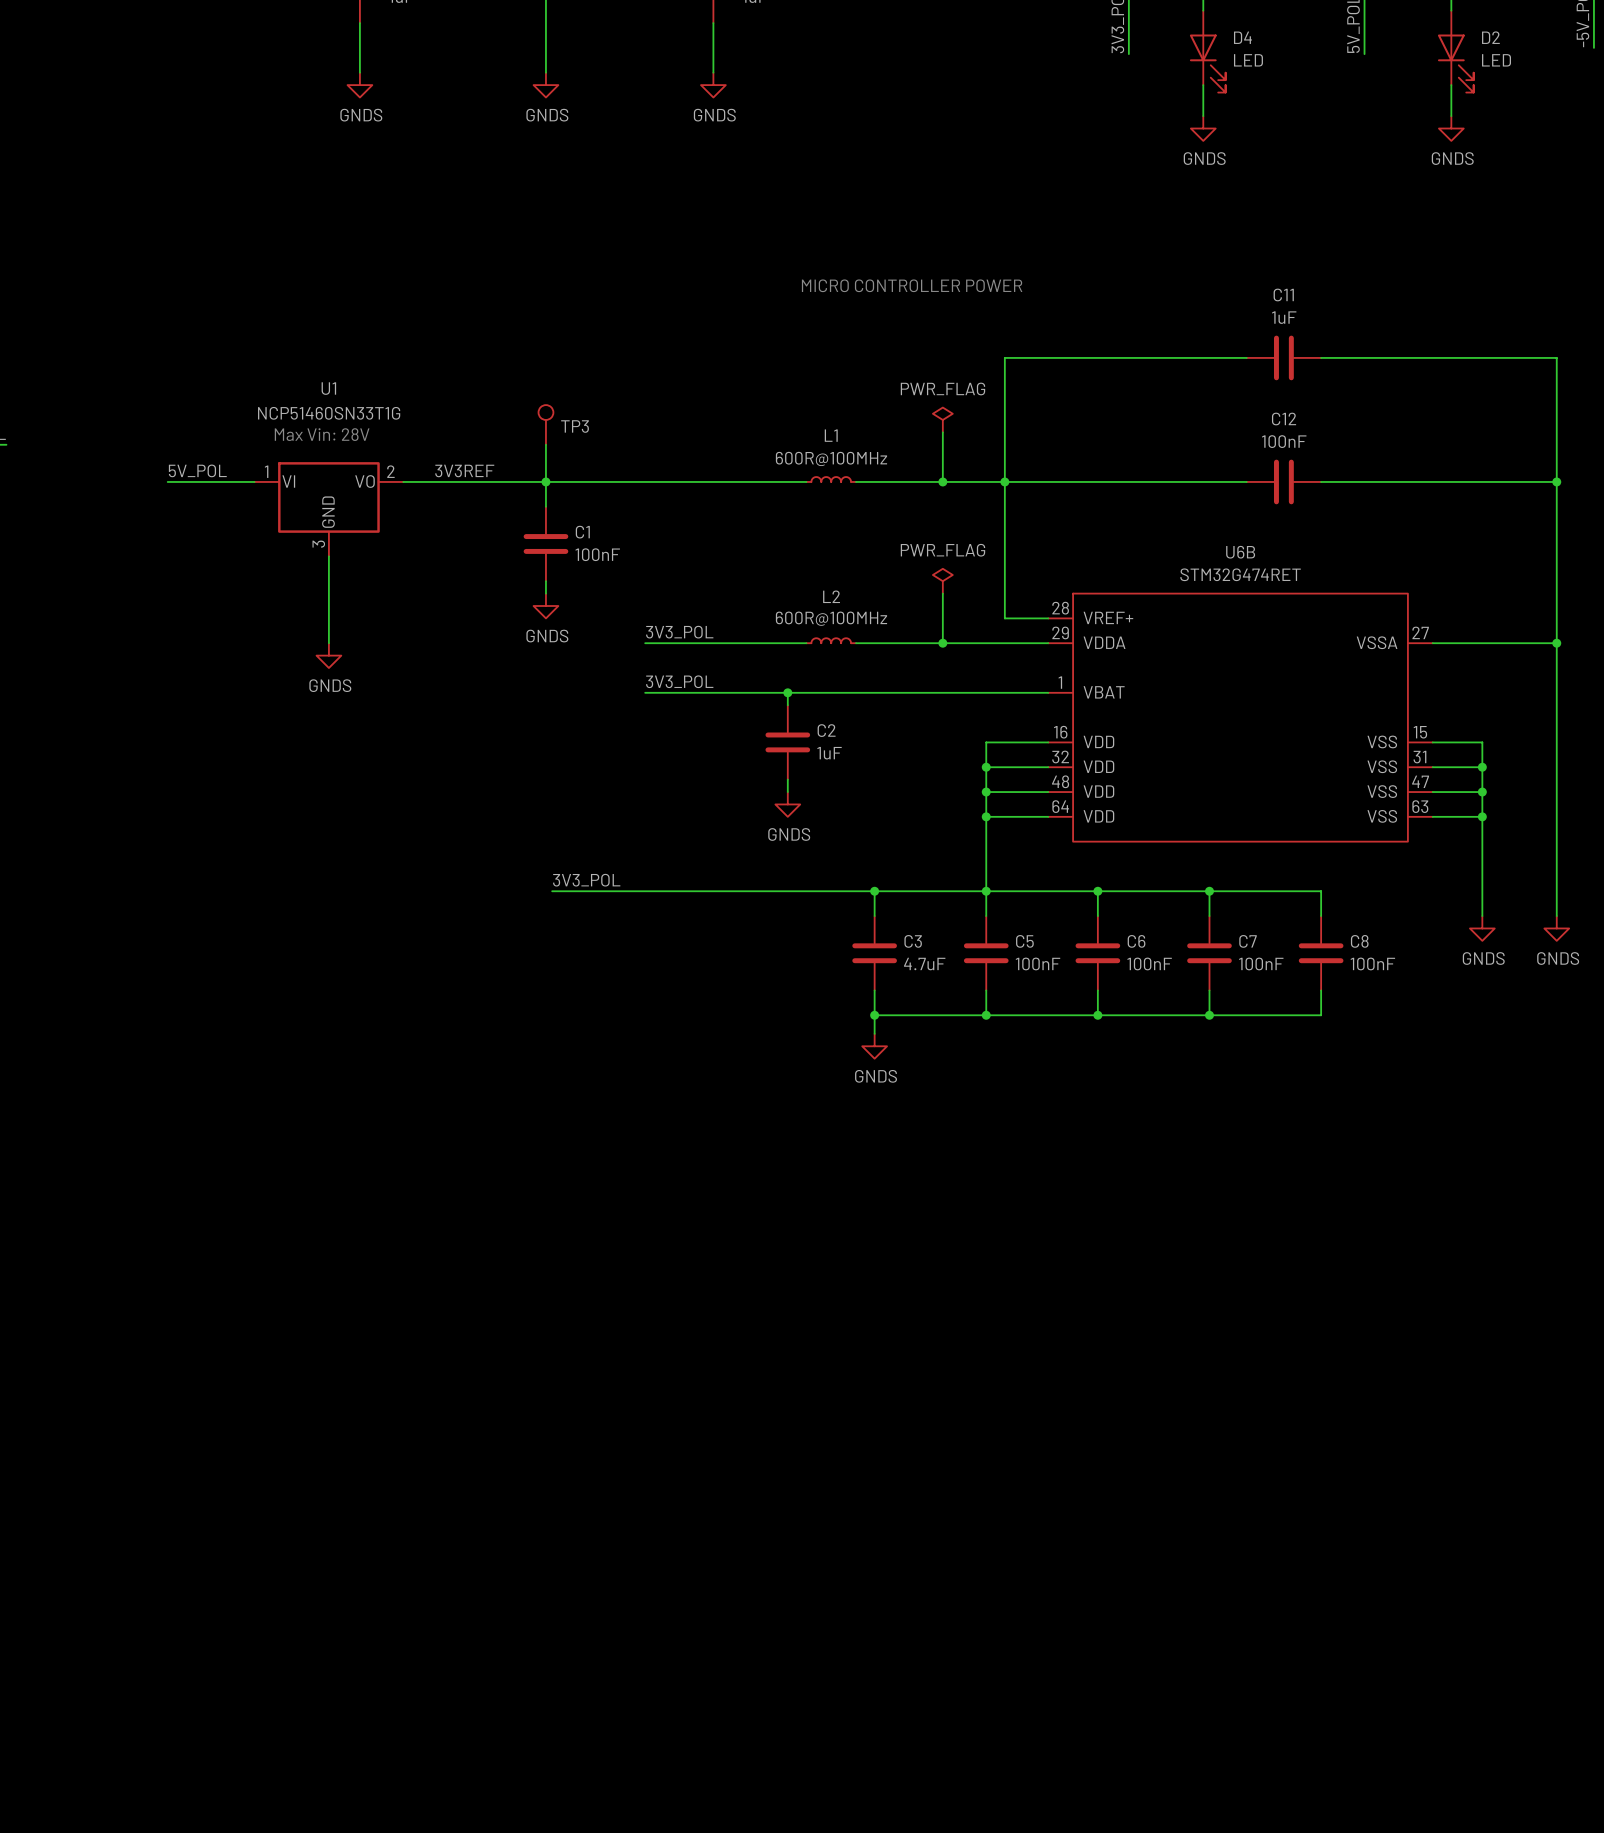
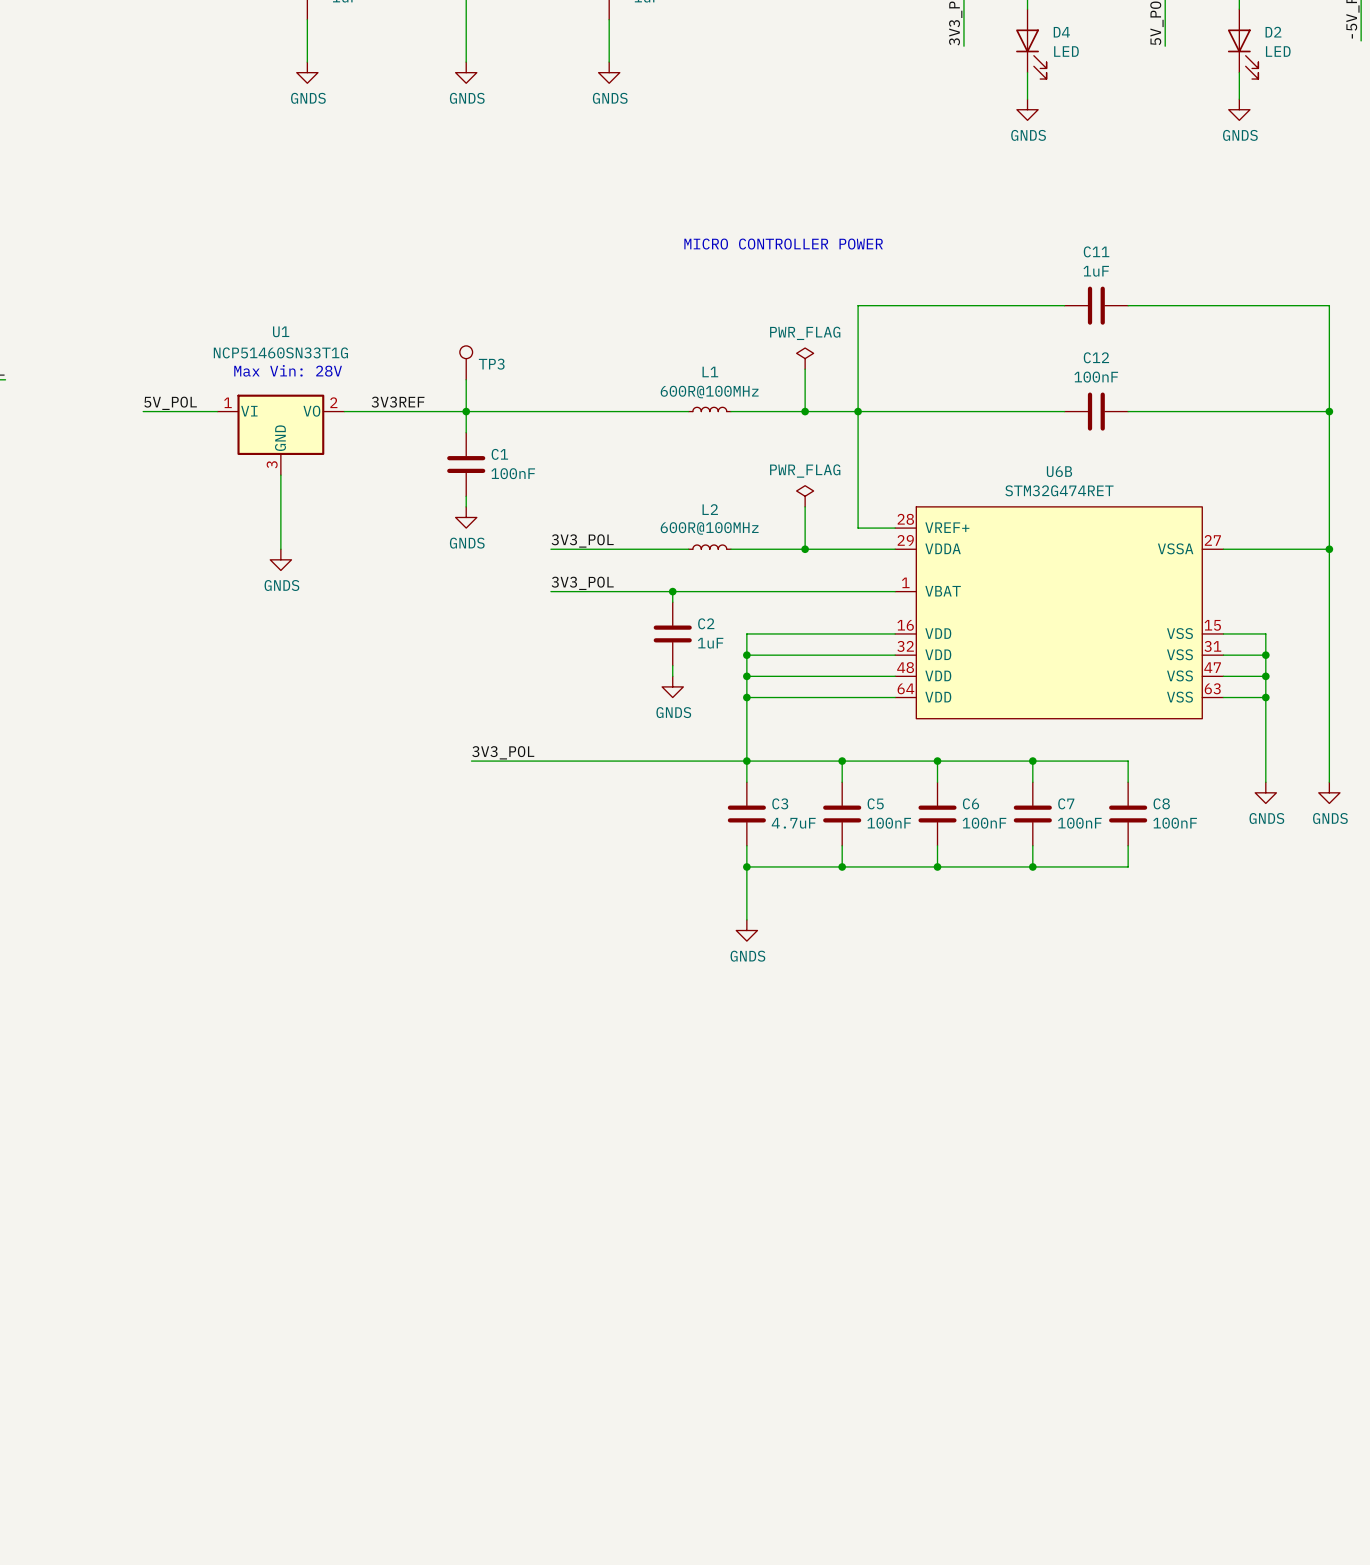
wire: (986, 742) (986, 891) -> (842, 633) (746, 633) (746, 761)
wire: none -> (746, 655) (842, 655)
junction: none -> (746, 655)
junction: (986, 767) -> none
wire: none -> (746, 676) (842, 676)
junction: none -> (746, 676)
junction: (986, 792) -> none
wire: none -> (746, 697) (842, 697)
junction: none -> (746, 697)
junction: (986, 816) -> none
wire: none -> (746, 882) (746, 919)
power symbol position: GNDS (874, 1046) -> GNDS (746, 930)

